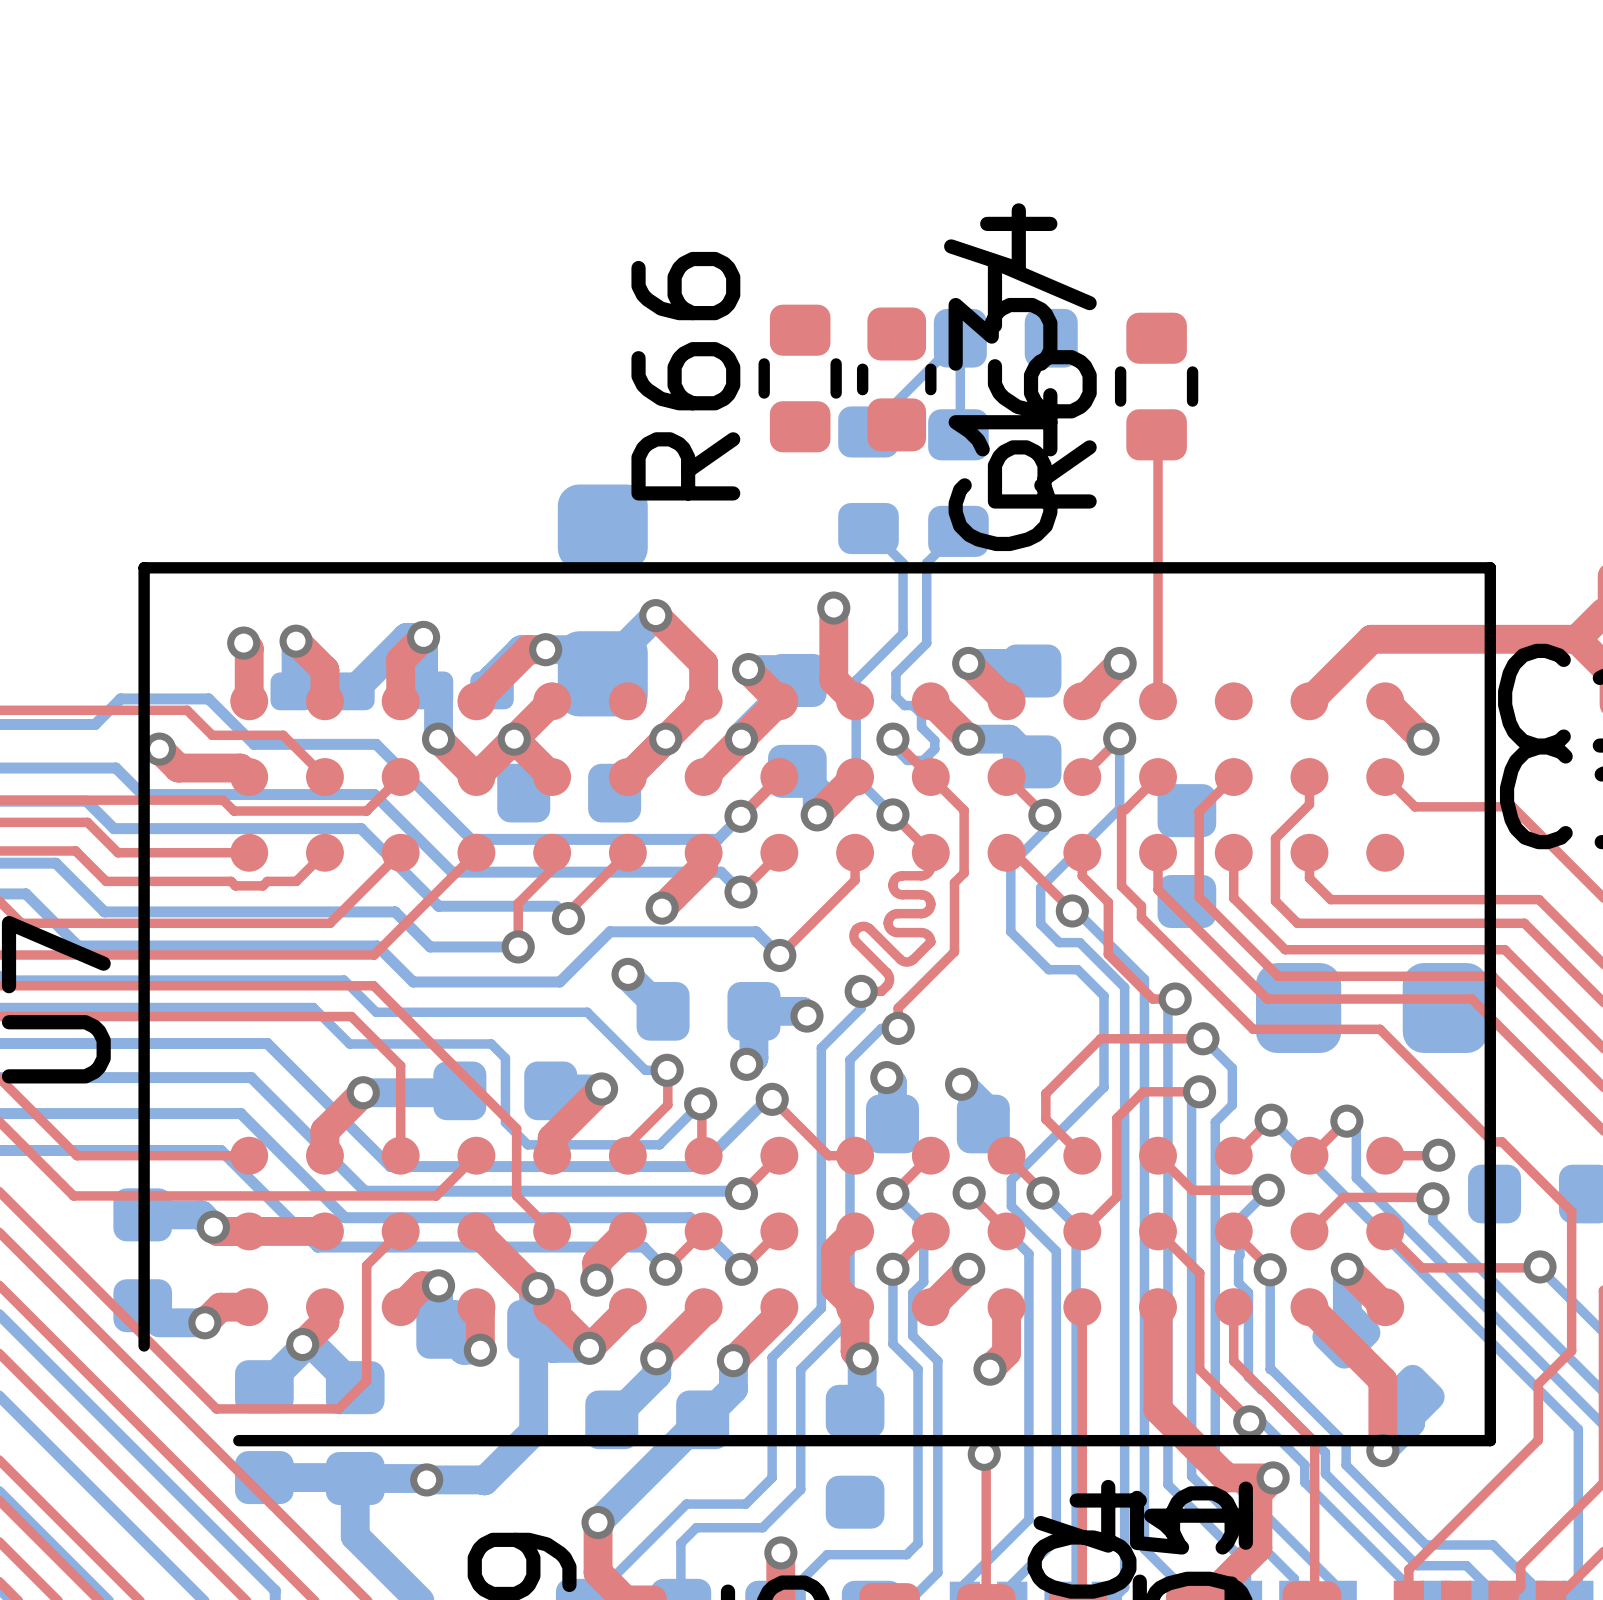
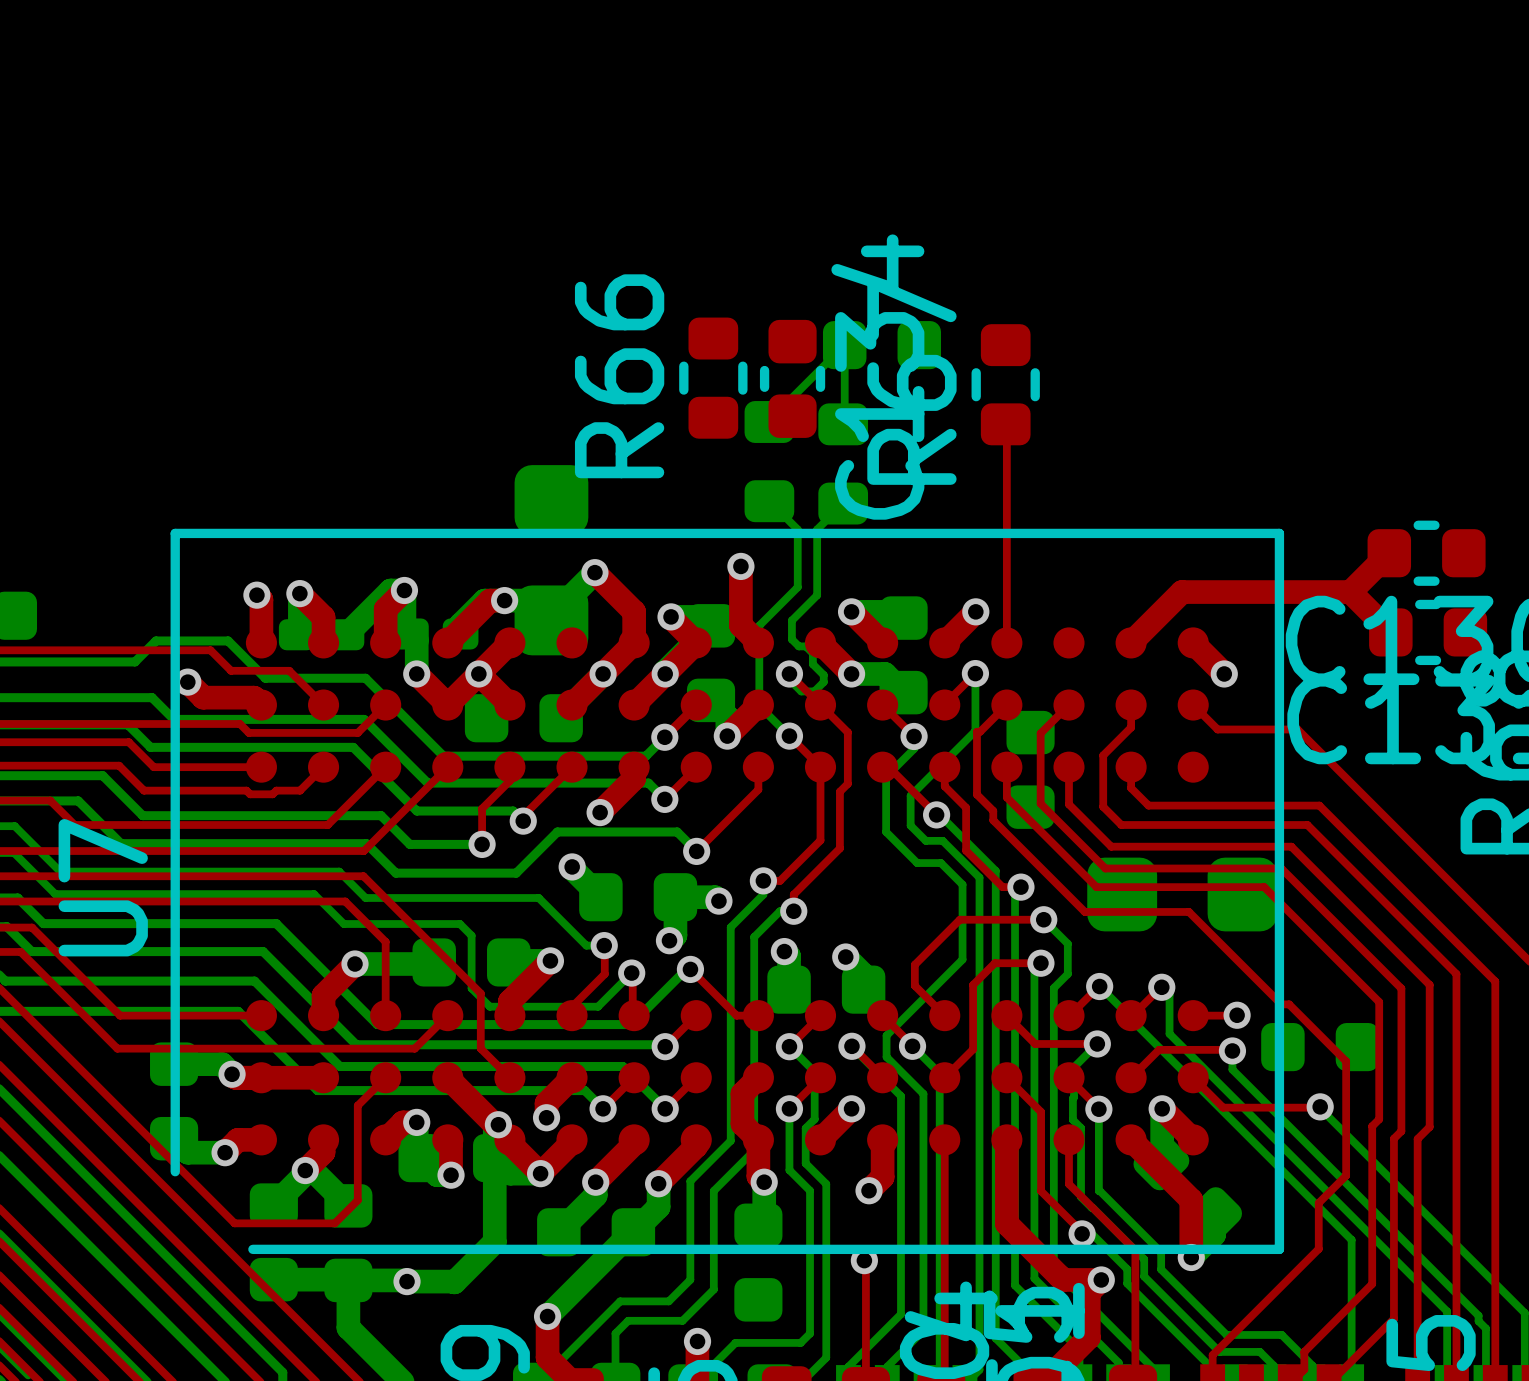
top track: (930, 866) (928, 872) (924, 875) (898, 876) (892, 885) (895, 891) (899, 894) (926, 896) (930, 902) (928, 910) (922, 913) (894, 914) (889, 918) (888, 923) (893, 931) (923, 932) (928, 936) (930, 942) -> (820, 778) (820, 840)
top track: (913, 959) (907, 961) (901, 960) (868, 927) (862, 926) (856, 929) (853, 934) (855, 940) (888, 975) (889, 980) (886, 986) -> (806, 854) (784, 876)

